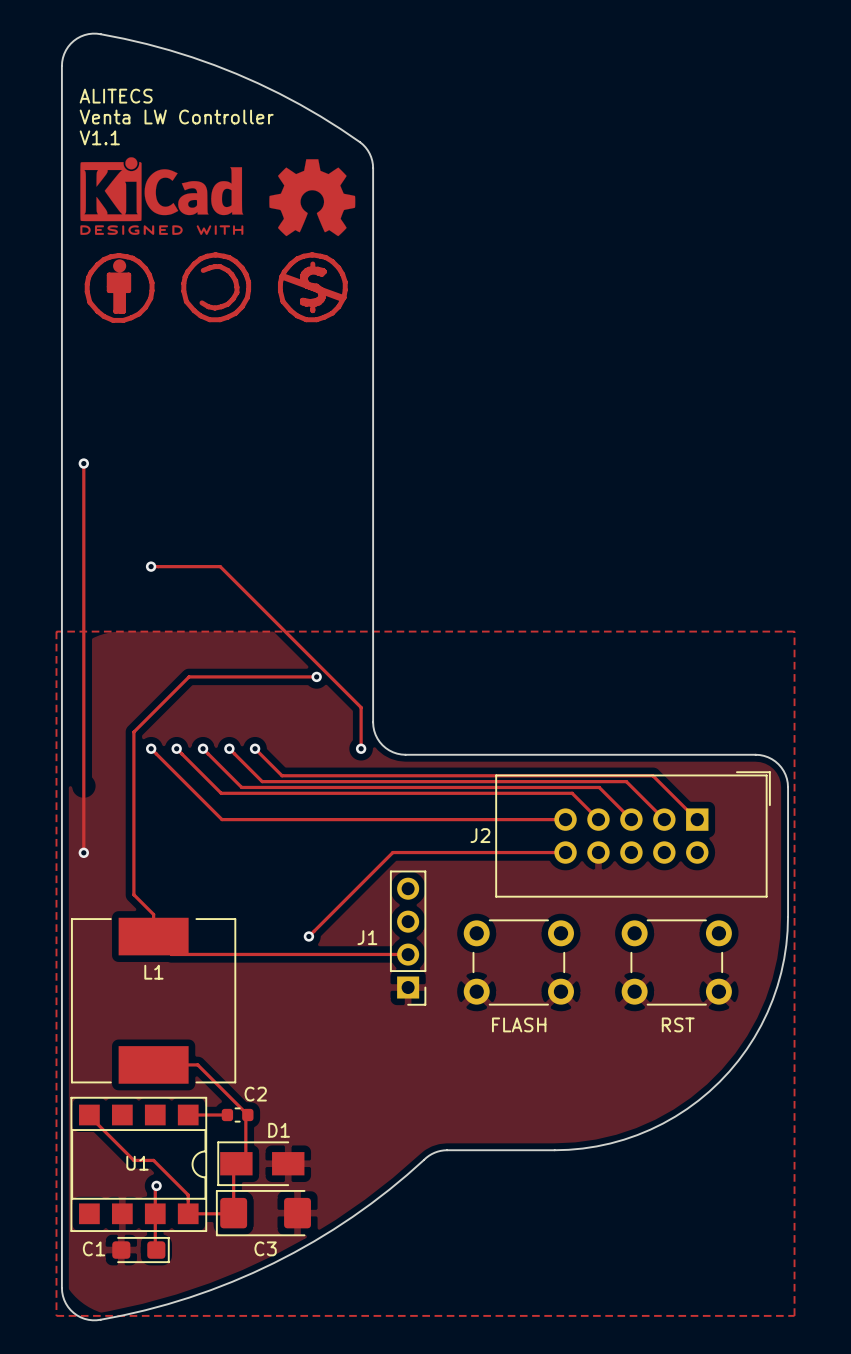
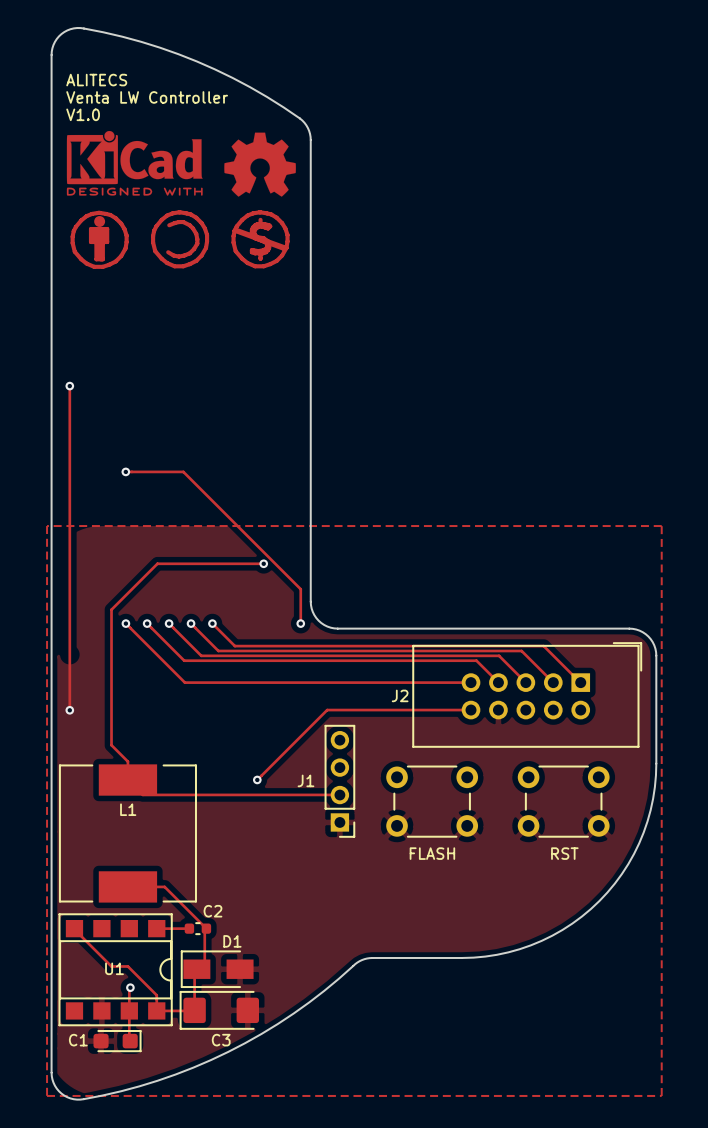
text: V1.1 (99, 137) -> V1.0 (83, 114)

